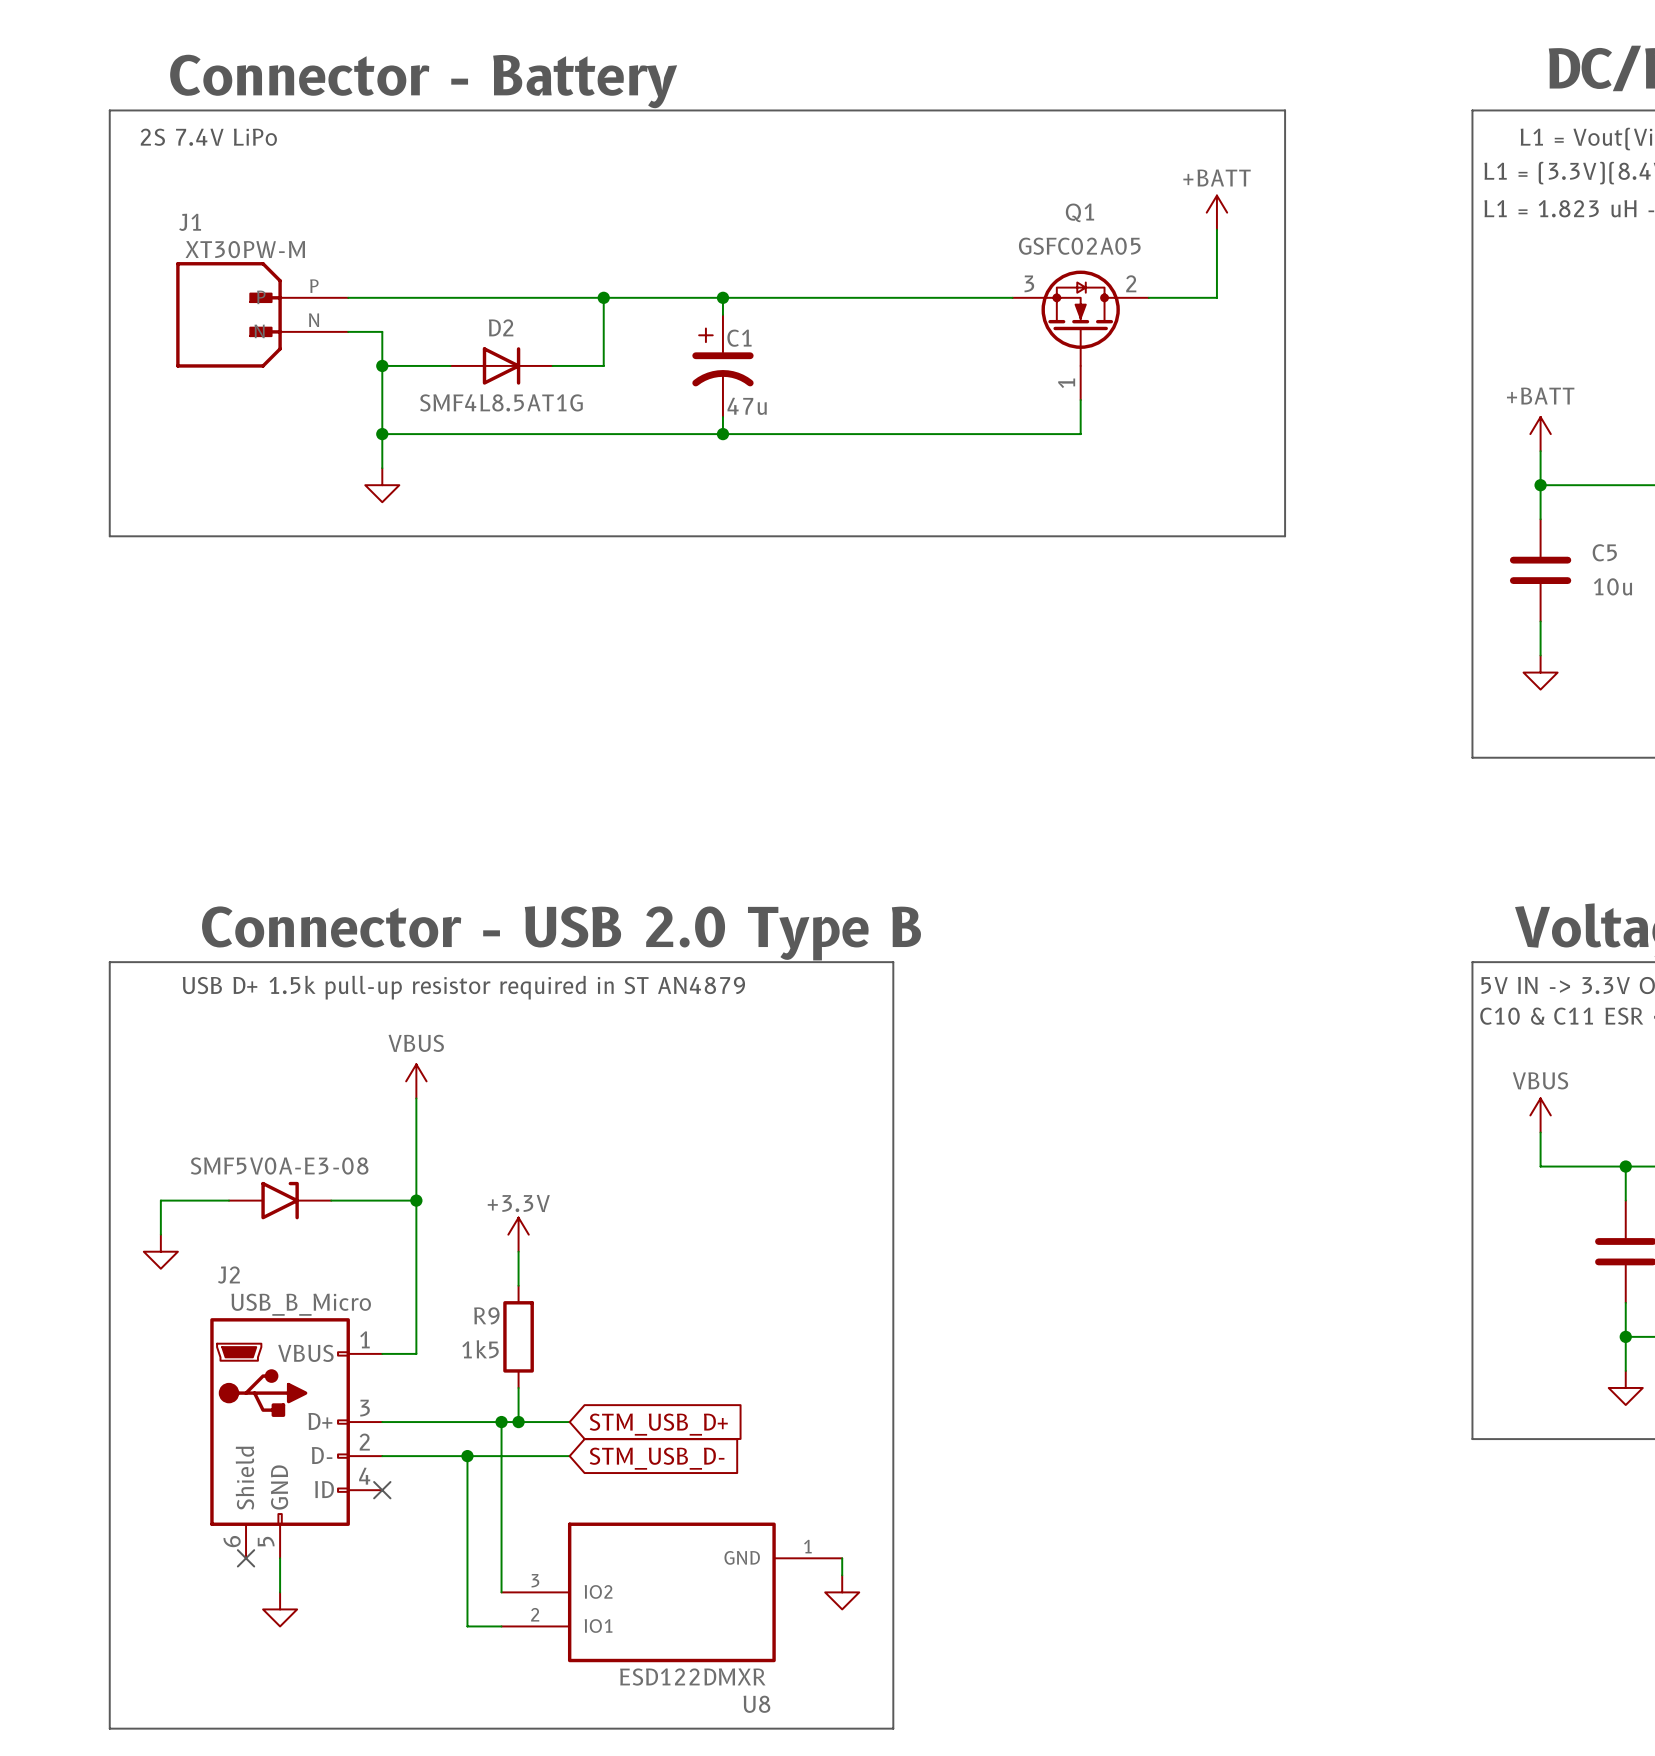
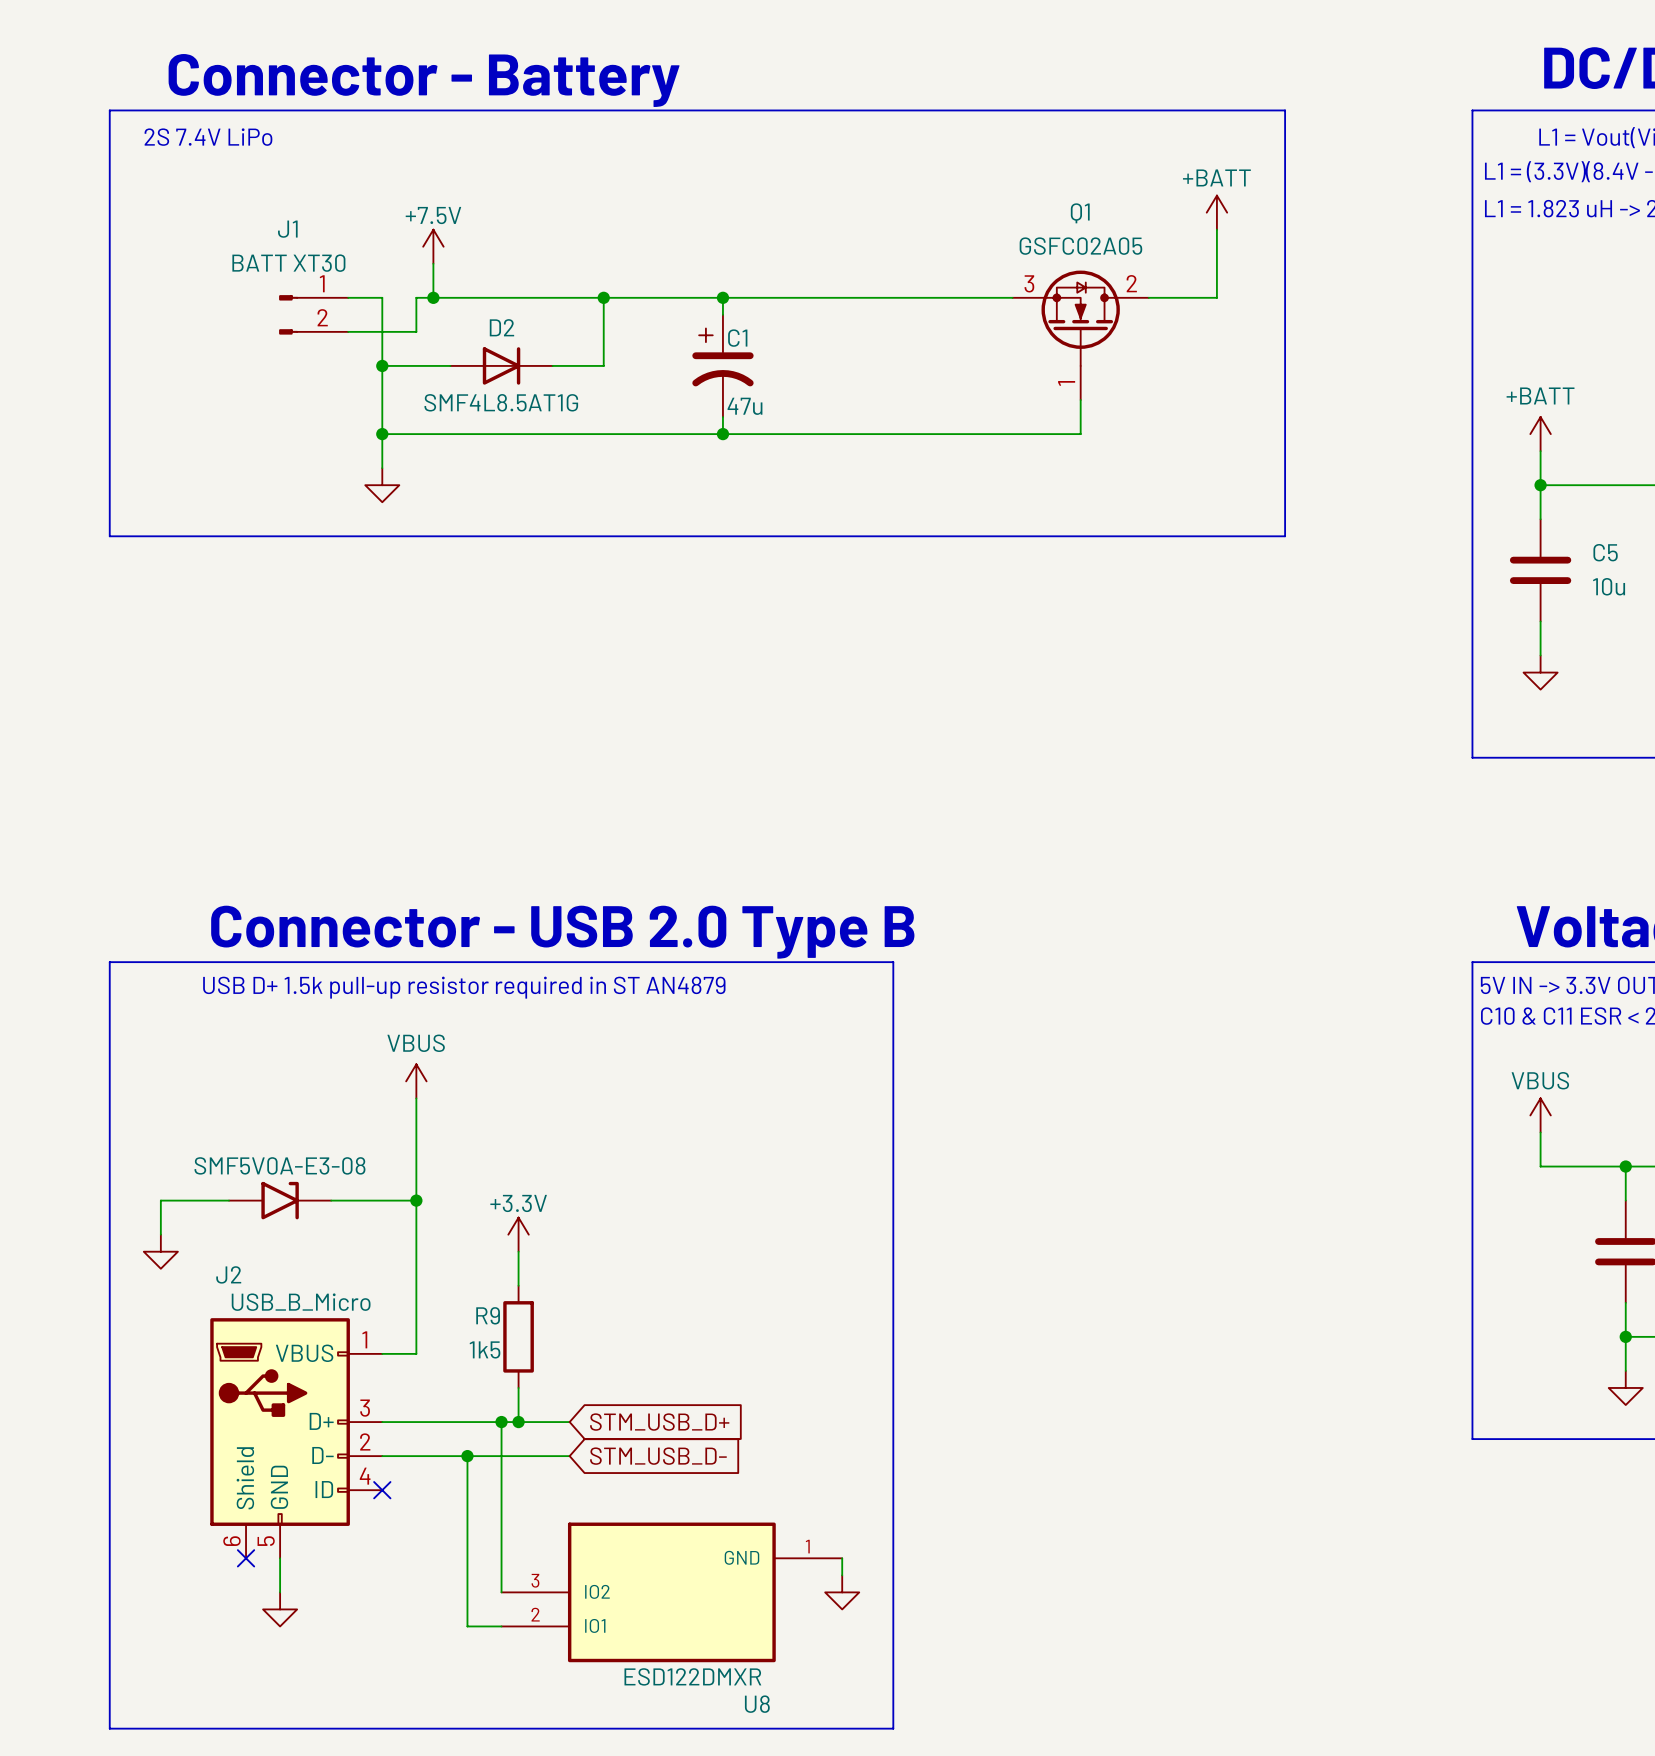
J1 name position: J1 (190, 222) -> J1 (287, 229)
power symbol: none -> +7.5V (433, 246)
J1 value: XT30PW-M (245, 249) -> BATT XT30 (288, 263)
J1 symbol: [176, 262, 349, 368] -> [279, 295, 349, 335]
wire: none -> (433, 263) (433, 297)
wire: (382, 297) (416, 297) -> (382, 297) (382, 331) (416, 331) (416, 297)
junction: none -> (433, 297)

